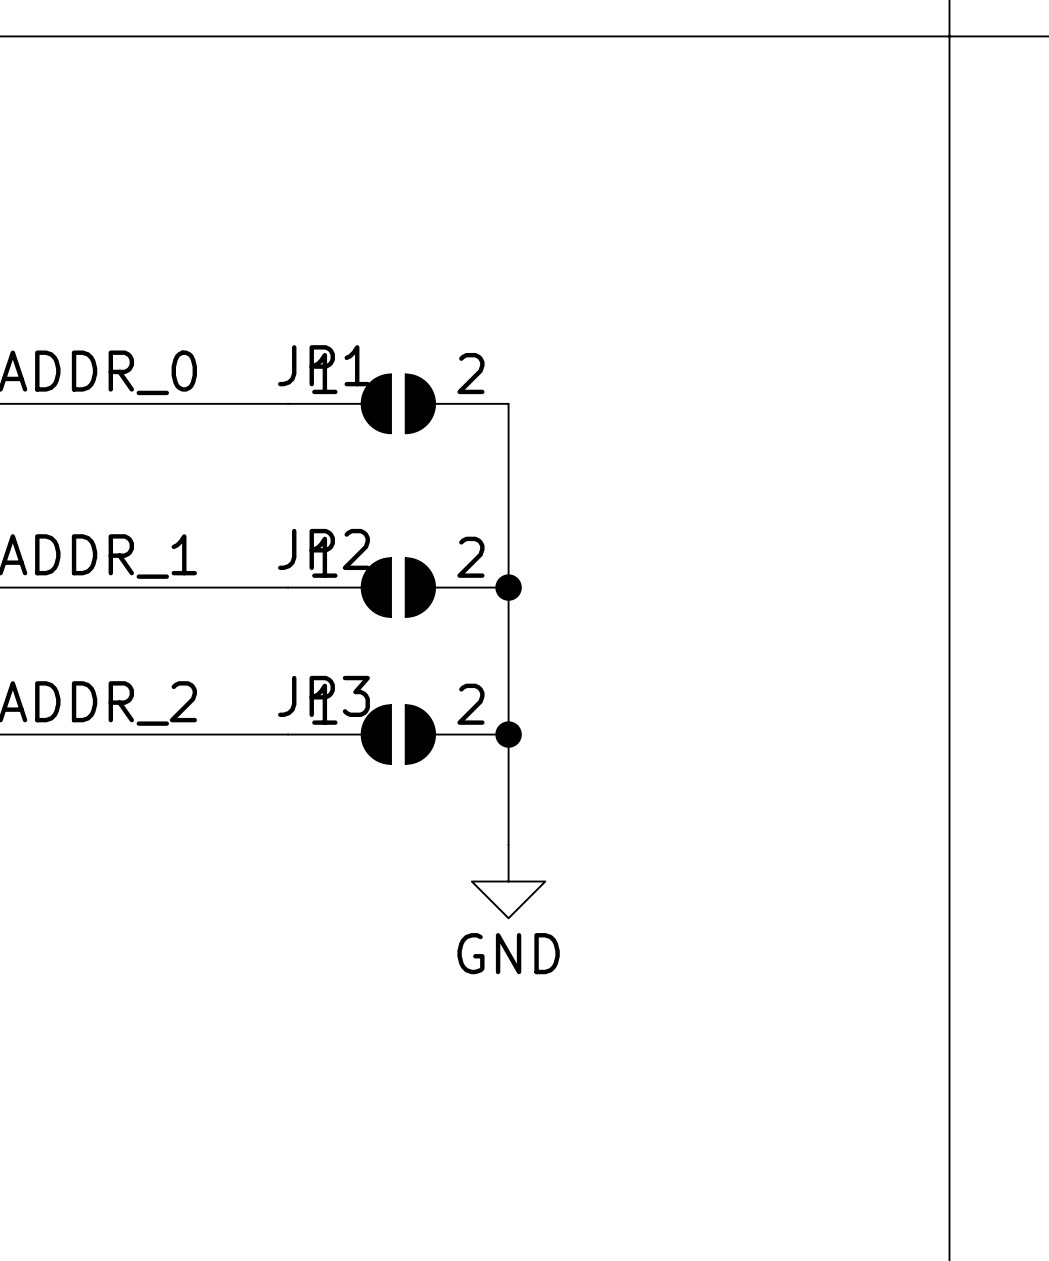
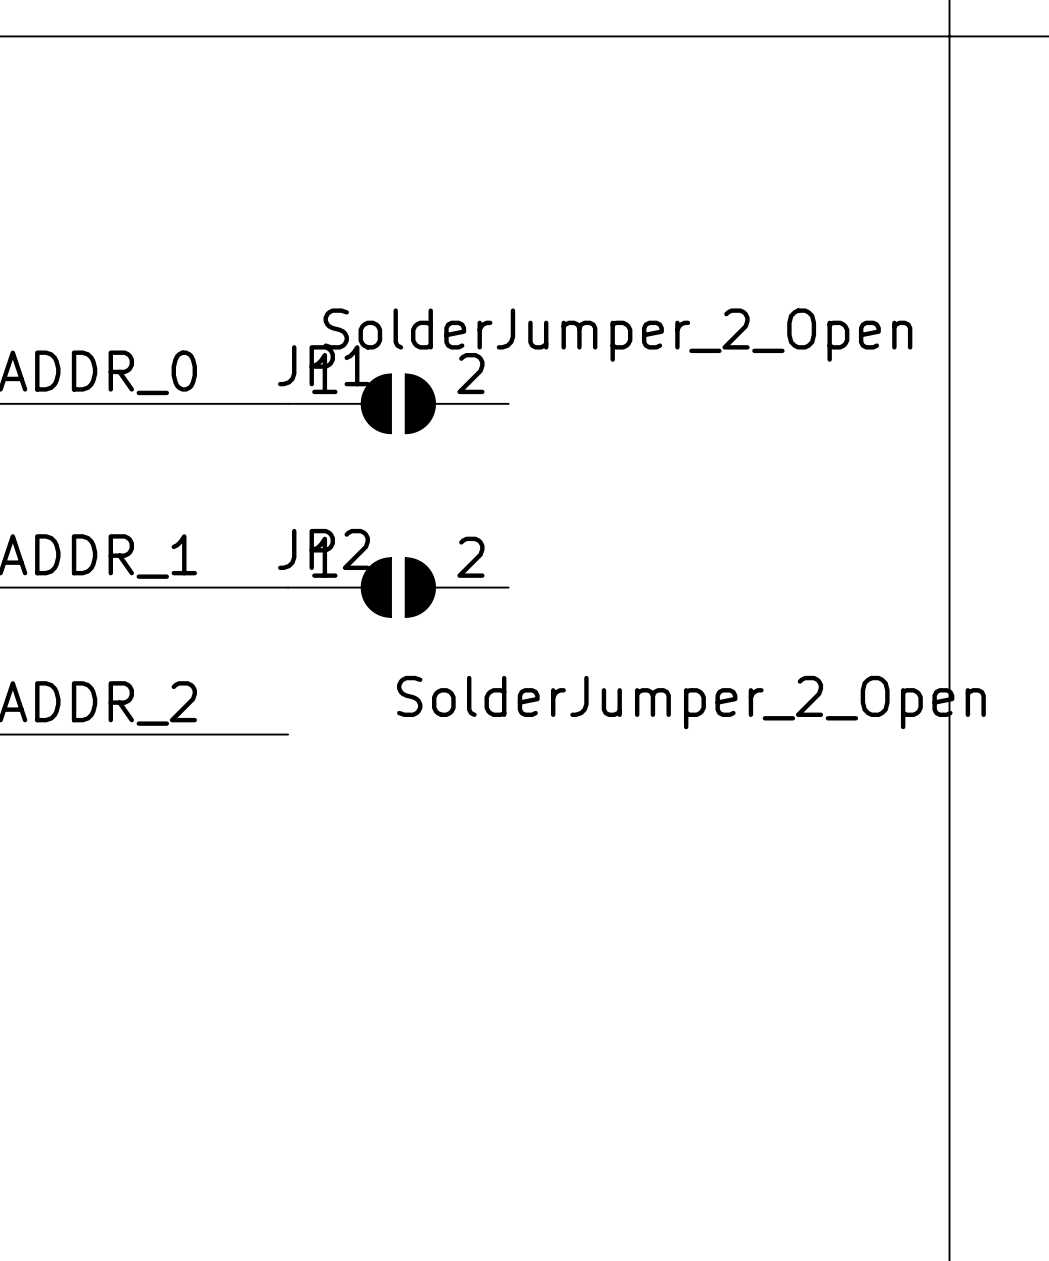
JP1 value: none -> SolderJumper_2_Open (617, 335)
wire: (508, 403) (508, 844) -> none
junction: (508, 587) -> none
JP2 value: none -> SolderJumper_2_Open (691, 702)
JP3: (398, 734) -> none
junction: (508, 734) -> none
power symbol: GND (508, 881) -> none

